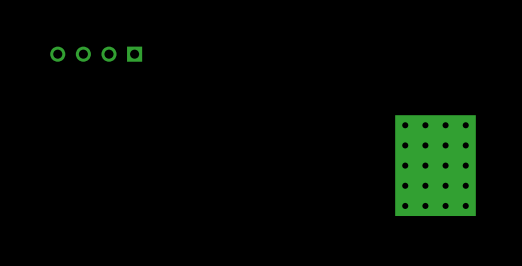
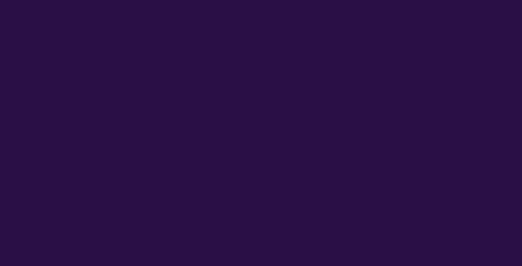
part: (96, 54) -> none
part: (435, 165) -> none

